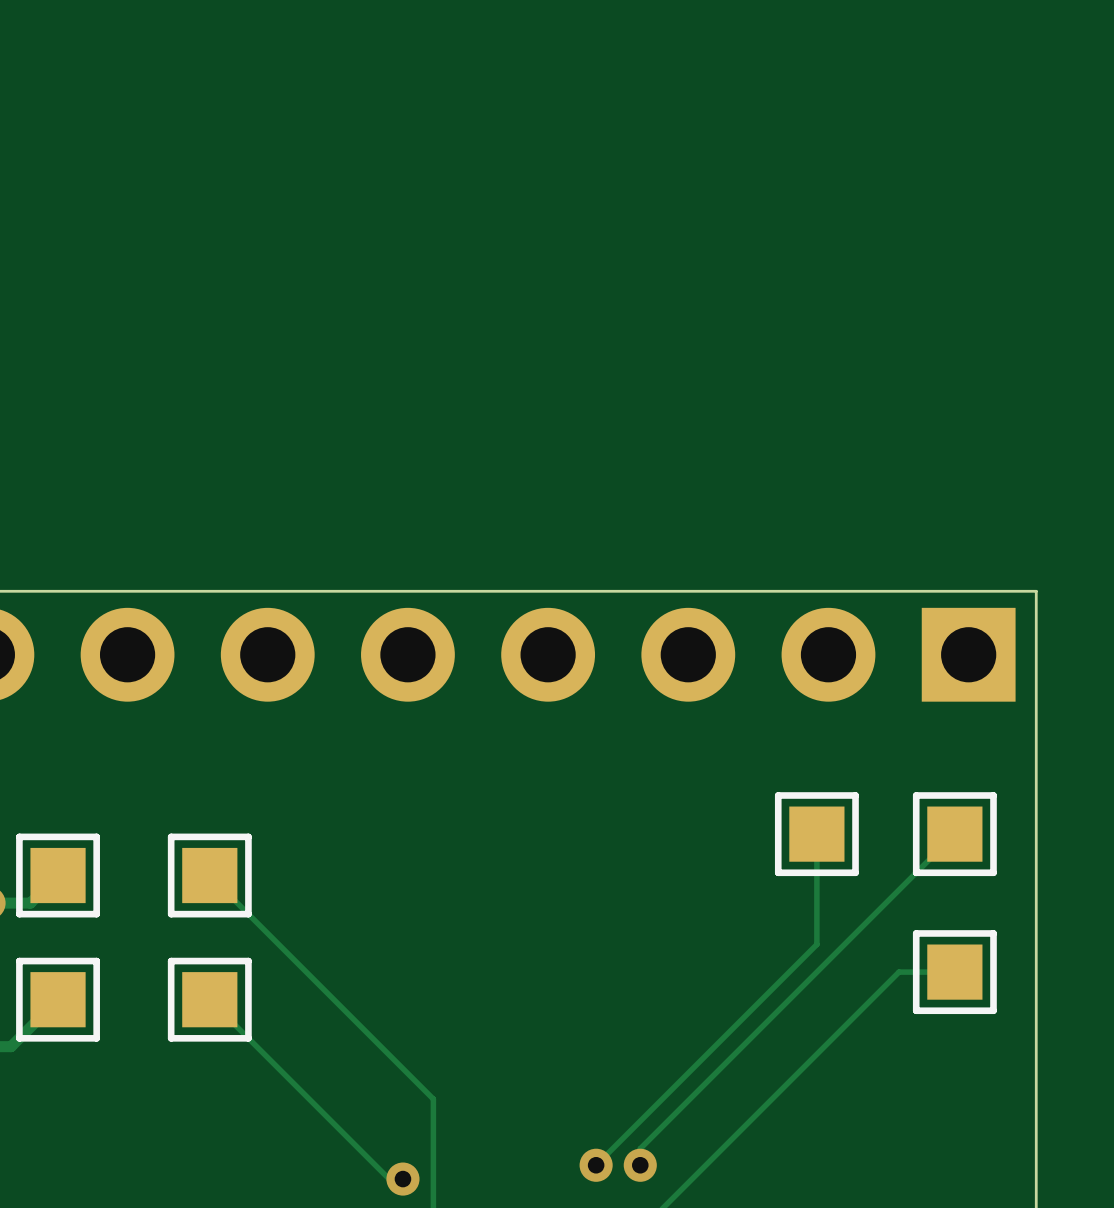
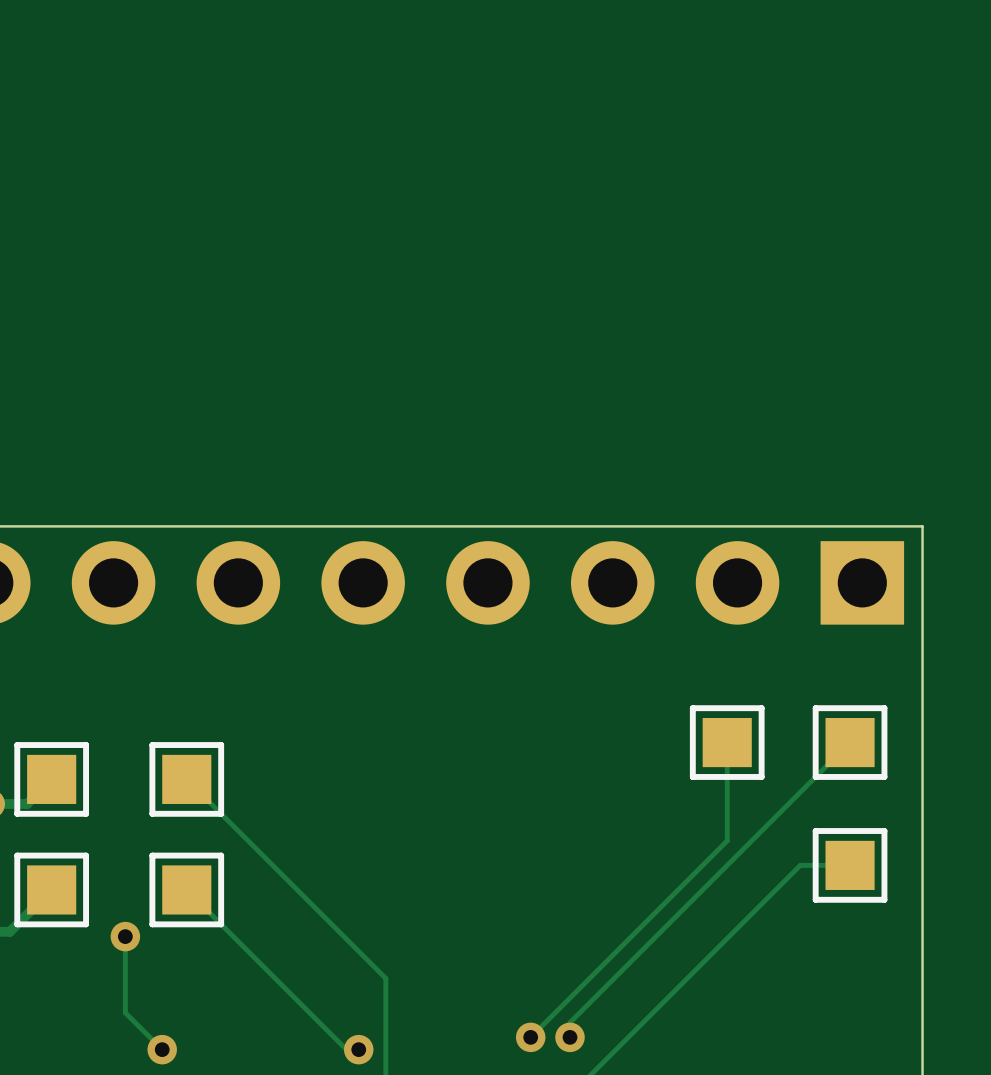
track: none -> (125, 936) (125, 1012) (162, 1049)
via: none -> (125, 936)
via: none -> (162, 1049)

